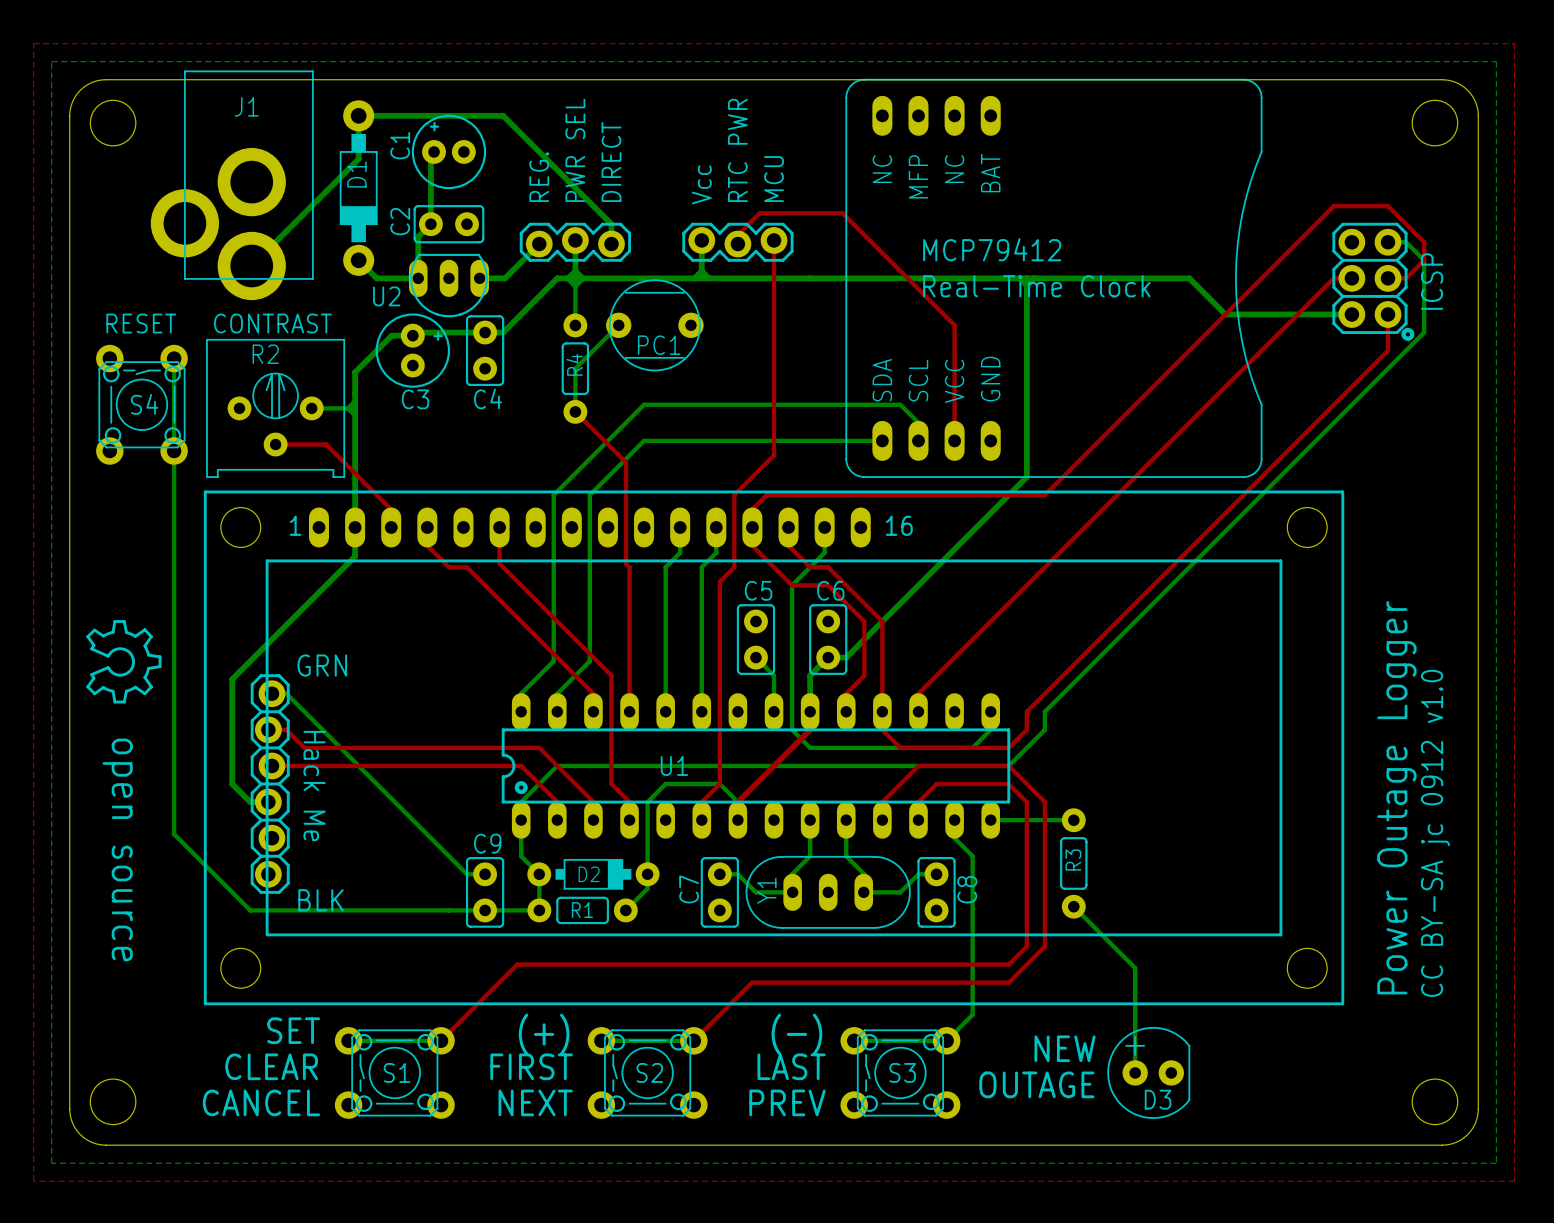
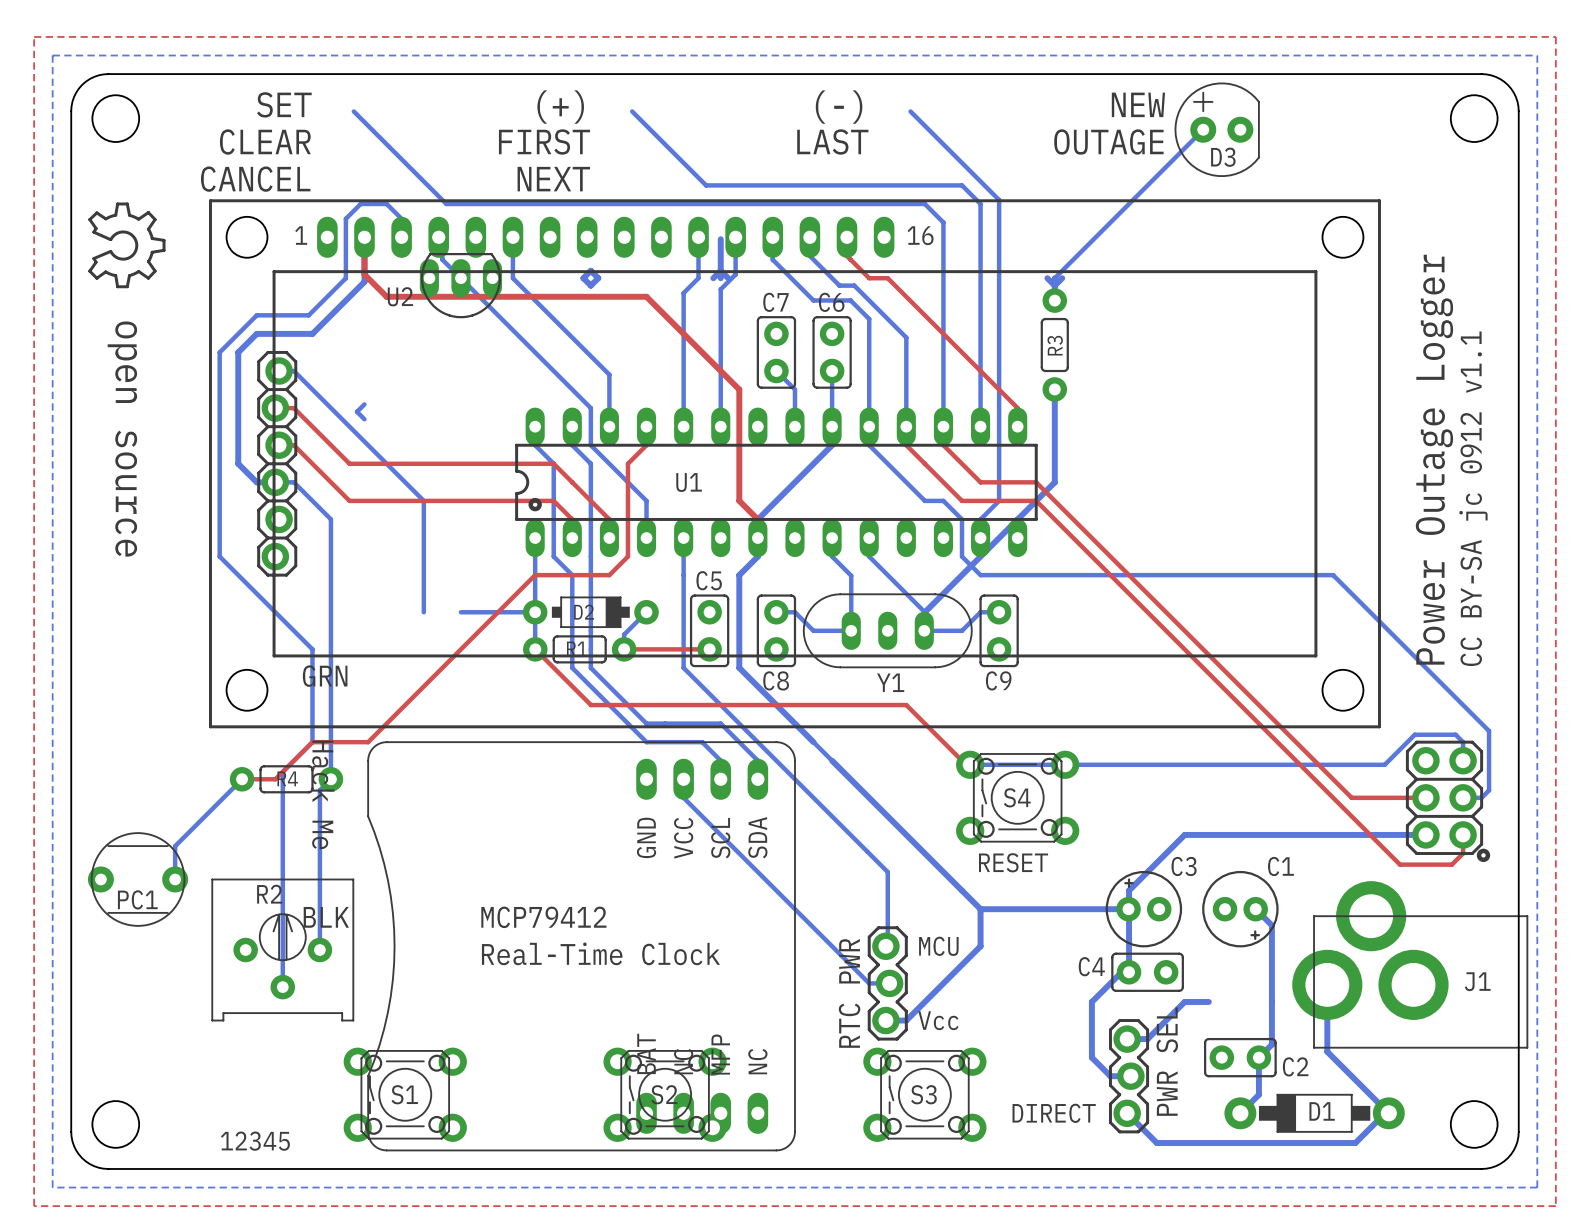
text: none -> SET (284, 104)
text: none -> NEW (1138, 104)
text: none -> (+) (560, 107)
text: none -> (-) (839, 107)
bottom track: none -> (353, 111) (446, 203) (924, 203) (943, 222) (943, 426)
bottom track: none -> (632, 111) (706, 185) (962, 185) (980, 203) (980, 426)
bottom track: none -> (910, 111) (999, 200) (999, 500) (980, 519) (980, 538)
bottom track: none -> (1203, 129) (1054, 278)
text: none -> CLEAR (265, 142)
C1 name position: C1 (400, 145) -> C1 (1280, 866)
text: none -> FIRST (544, 142)
text: none -> LAST (832, 142)
text: none -> OUTAGE (1108, 142)
text: PWR SEL (575, 150) -> none
text: RTC PWR (737, 150) -> none
bottom track: (434, 151) (430, 155) (430, 224) (418, 236) (418, 278) (376, 278) (358, 260) -> none
C1 rotation: 0° (448, 151) -> 180° (1240, 909)
C1 position: (448, 151) -> (1240, 909)
text: DIRECT (611, 161) -> none
text: REG. (539, 177) -> none
text: MCU (774, 179) -> none
text: none -> CANCEL (255, 179)
text: none -> NEXT (553, 179)
text: Vcc (701, 184) -> none
J1 rotation: 0° (232, 185) -> 90° clockwise (1410, 964)
J1 position: (232, 185) -> (1410, 964)
D1 rotation: 0° (358, 188) -> 90° clockwise (1314, 1113)
D1 position: (358, 188) -> (1314, 1113)
drawing: none -> [88, 202, 166, 289]
C2 name rotation: 0° (400, 221) -> 90° clockwise (1295, 1066)
C2 name position: C2 (400, 221) -> C2 (1295, 1066)
C2 position: (448, 224) -> (1240, 1057)
top track: none -> (364, 237) (364, 274) (386, 296) (646, 296) (739, 389) (739, 500) (757, 519) (757, 538)
bottom track: none -> (364, 237) (364, 281) (312, 333) (256, 333) (238, 352) (238, 463) (256, 482) (293, 482) (330, 519) (330, 779) (319, 790) (319, 950)
bottom track: none -> (401, 237) (405, 233) (405, 222) (386, 203) (360, 203) (345, 218) (345, 278) (308, 315) (256, 315) (219, 352) (219, 556) (312, 649) (312, 742) (282, 771) (282, 987)
bottom track: none -> (512, 237) (512, 278) (609, 374) (609, 426)
bottom track: none -> (698, 237) (698, 278) (683, 293) (683, 426)
bottom track: none -> (735, 237) (735, 274) (720, 289) (720, 426)
bottom track: none -> (772, 237) (772, 259) (813, 300) (850, 300) (869, 319) (869, 445) (924, 500) (943, 500) (962, 519) (962, 556) (980, 575) (1333, 575) (1489, 731) (1489, 790) (1481, 797) (1463, 797)
bottom track: none -> (809, 237) (809, 255) (839, 285) (854, 285) (906, 337) (906, 426)
top track: none -> (847, 237) (847, 256) (869, 278) (887, 278) (1017, 408) (1017, 426)
bottom track: (575, 240) (575, 325) -> none
top track: (774, 240) (774, 455) (734, 495) (734, 567) (719, 581) (719, 784) (701, 802) (701, 820) -> none
part: (575, 242) -> none
part: (737, 242) -> none
bottom track: (1388, 242) (1406, 242) (1424, 260) (1424, 332) (1044, 711) (1044, 729) (1008, 765) (557, 765) (521, 802) (521, 856) (539, 874) (539, 910) (250, 910) (174, 834) (174, 358) -> none
bottom track: (539, 244) (504, 278) (479, 278) -> none
bottom track: (611, 244) (611, 224) (503, 115) (358, 115) (358, 159) (251, 265) -> none
top track: (737, 244) (737, 235) (759, 213) (842, 213) (954, 325) (954, 440) -> none
text: MCP79412 (992, 249) -> none
part: (1053, 278) -> none
top track: (1351, 278) (1333, 278) (918, 693) (918, 711) -> none
top track: (1388, 278) (1406, 278) (1424, 260) (1424, 242) (1388, 206) (1333, 206) (1044, 495) (1008, 495) -> (1463, 834) (1463, 853) (1451, 864) (1399, 864) (1036, 500)
part: (1373, 281) -> none
text: ICSP (1432, 281) -> none
text: Real-Time Clock (1036, 286) -> none
bottom track: (1026, 300) (1026, 386) -> none
bottom track: (1351, 314) (1225, 314) (1189, 278) (557, 278) (503, 332) (412, 332) (412, 335) (391, 335) (355, 372) (355, 556) (232, 679) (232, 784) (250, 802) (268, 802) -> none
top track: (1388, 314) (1388, 350) (1026, 711) (1026, 729) (1008, 747) (900, 747) (882, 729) (882, 621) (828, 567) (810, 567) (788, 545) (788, 527) -> none
text: RESET (141, 323) -> none
text: CONTRAST (272, 323) -> none
bottom track: (618, 325) (575, 368) (575, 404) -> (438, 237) (442, 240) (442, 259) (590, 408)
PC1 position: (654, 325) -> (138, 879)
PC1 name position: PC1 (659, 345) -> PC1 (137, 899)
C3 rotation: 0° (412, 350) -> 90° counterclockwise (1143, 909)
C3 position: (412, 350) -> (1143, 909)
C4 rotation: 0° (485, 350) -> 90° clockwise (1147, 972)
C4 position: (485, 350) -> (1147, 972)
bottom track: none -> (279, 371) (293, 371) (423, 500) (423, 612)
R4 rotation: 0° (575, 368) -> 90° clockwise (286, 779)
R4 position: (575, 368) -> (286, 779)
C3 name position: C3 (415, 399) -> C3 (1184, 866)
S4 rotation: 0° (141, 404) -> 90° counterclockwise (1017, 797)
S4 position: (141, 404) -> (1017, 797)
R2 position: (275, 408) -> (282, 950)
bottom track: (311, 408) (355, 408) -> none
top track: (575, 411) (625, 462) (625, 563) (629, 567) (629, 711) -> none
bottom track: none -> (590, 415) (590, 445) (646, 500) (646, 538)
bottom track: none -> (535, 426) (535, 445) (553, 463) (553, 556) (572, 575) (572, 667) (646, 742) (702, 742) (720, 760) (720, 779)
bottom track: none -> (572, 426) (572, 445) (590, 463) (590, 667) (646, 723) (720, 723) (757, 760) (757, 779)
top track: none -> (646, 426) (646, 445) (627, 463) (627, 556) (609, 575) (535, 575) (368, 742) (312, 742) (275, 779) (242, 779)
top track: none -> (943, 426) (943, 445) (980, 482) (1036, 482) (1351, 797) (1425, 797)
text: none -> open source (122, 439)
top track: none -> (279, 445) (293, 445) (349, 500) (553, 500) (572, 519) (572, 538)
bottom track: (882, 440) (644, 440) (589, 495) (589, 661) (557, 693) (557, 711) -> none
bottom track: (918, 440) (918, 422) (900, 404) (644, 404) (553, 495) (553, 661) (521, 693) (521, 711) -> none
top track: (275, 444) (326, 444) -> (275, 408) (293, 408) (334, 448)
top track: (340, 458) (391, 509) (391, 527) -> (349, 463) (553, 463) (609, 519) (609, 538)
top track: (936, 495) (766, 495) (752, 509) (752, 545) (792, 585) (828, 585) (864, 621) (864, 675) (846, 693) (846, 711) -> (962, 500) (906, 445) (906, 426)
top track: (427, 527) (427, 545) (448, 567) (467, 567) (593, 693) (593, 711) -> none
top track: (499, 527) (499, 563) (611, 675) (611, 784) (629, 802) (629, 820) -> none
bottom track: (680, 527) (680, 552) (665, 567) -> (683, 538) (683, 575)
bottom track: (716, 527) (716, 552) (701, 567) (701, 711) -> none
bottom track: (824, 527) (824, 552) (792, 585) (792, 729) -> (832, 371) (832, 445) (757, 519) (757, 556) (739, 575) (739, 667) (813, 742)
bottom track: none -> (535, 538) (535, 649)
bottom track: none -> (832, 538) (832, 556) (851, 575) (851, 630) (813, 630) (794, 612) (776, 612)
bottom track: none -> (869, 538) (869, 556) (924, 612) (924, 630) (962, 630) (980, 612) (999, 612)
bottom track: none -> (460, 612) (535, 612)
bottom track: none -> (646, 612) (624, 634) (624, 649)
bottom track: (899, 603) (846, 657) (828, 657) (810, 675) (810, 711) -> none
drawing: [86, 620, 162, 704] -> none
top track: none -> (535, 649) (590, 705) (906, 705) (966, 764) (970, 764)
top track: none -> (624, 649) (709, 649)
C5 position: (755, 639) -> (709, 630)
C6 position: (828, 639) -> (832, 352)
bottom track: (665, 657) (665, 711) -> (683, 667) (887, 872) (887, 946) (885, 946)
bottom track: (755, 657) (774, 675) (774, 711) -> (776, 371) (794, 389) (794, 426)
bottom track: (271, 693) (286, 693) (467, 874) (485, 874) -> none
top track: (810, 711) (810, 729) (737, 802) (737, 820) -> none
bottom track: (990, 711) (990, 729) (972, 747) (810, 747) -> (980, 909) (832, 760)
top track: (268, 729) (286, 729) (304, 747) (539, 747) (593, 802) (593, 820) -> none
part position: (774, 747) -> (794, 463)
bottom track: none -> (1463, 760) (1463, 742) (1455, 734) (1414, 734) (1384, 764) (970, 764)
bottom track: none -> (242, 779) (175, 846) (175, 879)
top track: (271, 765) (521, 765) (557, 802) (557, 820) -> none
bottom track: none -> (683, 779) (683, 797) (869, 983) (889, 983)
U1 position: (755, 765) -> (776, 482)
part position: (270, 784) -> (277, 463)
part: none -> (1448, 801)
text position: Power Outage Logger (1396, 797) -> Power Outage Logger (1434, 459)
bottom track: (737, 820) (737, 802) (719, 784) (665, 784) (647, 802) (647, 888) (625, 910) -> none
bottom track: (810, 820) (810, 856) (792, 874) (792, 892) (755, 892) (737, 874) (719, 874) -> none
bottom track: (846, 820) (846, 856) (864, 874) (863, 892) (900, 892) (918, 874) (936, 874) -> none
top track: (882, 820) (882, 802) (918, 765) (1008, 765) (1044, 802) (1044, 946) (1008, 982) (751, 982) (693, 1040) -> none
top track: (918, 820) (918, 802) (936, 784) (1008, 784) (1026, 802) (1026, 946) (1008, 964) (517, 964) (441, 1040) -> none
bottom track: (954, 820) (954, 838) (972, 856) (972, 1014) (946, 1040) (854, 1040) -> none
bottom track: (990, 820) (1073, 820) -> none
bottom track: none -> (1425, 834) (1184, 834) (1129, 890) (1128, 909)
text: CC BY-SA jc 0912 v1.0 (1435, 833) -> CC BY-SA jc 0912 v1.1 (1473, 498)
C9 name position: C9 (487, 843) -> C9 (998, 680)
text: none -> RESET (1013, 862)
text: open source (117, 849) -> none
R3 name position: R3 (1073, 859) -> R3 (1055, 345)
R3 position: (1073, 863) -> (1054, 345)
D2 position: (593, 874) -> (590, 612)
C7 name rotation: 0° (689, 889) -> 90° clockwise (775, 302)
C7 name position: C7 (689, 889) -> C7 (775, 302)
C8 name rotation: 0° (967, 889) -> 90° clockwise (776, 680)
C8 name position: C8 (967, 889) -> C8 (776, 680)
Y1 name rotation: 0° (766, 890) -> 90° clockwise (890, 682)
Y1 name position: Y1 (766, 890) -> Y1 (890, 682)
C9 position: (485, 892) -> (999, 630)
C7 position: (719, 892) -> (776, 352)
Y1 position: (828, 892) -> (887, 630)
C8 position: (936, 892) -> (776, 630)
bottom track: none -> (980, 909) (1128, 909)
bottom track: none -> (980, 909) (980, 946) (906, 1020) (885, 1020)
bottom track: none -> (1128, 909) (1129, 972) (1121, 972) (1091, 1001) (1091, 1057) (1110, 1076) (1130, 1076)
bottom track: none -> (1255, 909) (1271, 925) (1271, 1044) (1258, 1057) (1258, 1094) (1240, 1113)
text: none -> MCP79412 (543, 917)
bottom track: (1073, 906) (1135, 968) (1135, 1072) -> none
R1 position: (582, 910) -> (579, 649)
part: none -> (581, 946)
text: none -> MCU (938, 946)
text: none -> Real-Time Clock (600, 953)
part: none -> (887, 983)
bottom track: none -> (1327, 984) (1327, 1051) (1388, 1113) (1385, 1113) (1355, 1143) (1156, 1143) (1127, 1113)
text: none -> RTC PWR (849, 993)
bottom track: none -> (1208, 1001) (1184, 1001) (1147, 1039) (1127, 1039)
text: none -> Vcc (938, 1020)
text: SET (293, 1030) -> none
text: (+) (544, 1034) -> none
text: (-) (796, 1034) -> none
bottom track: (348, 1040) (441, 1040) -> none
bottom track: (601, 1040) (693, 1040) -> none
text: none -> PWR SEL (1167, 1061)
text: NEW (1065, 1048) -> none
part: none -> (1129, 1076)
text: CLEAR (271, 1066) -> none
text: FIRST (531, 1066) -> none
text: LAST (791, 1066) -> none
D3 position: (1148, 1072) -> (1217, 129)
text: OUTAGE (1036, 1084) -> none
text: none -> DIRECT (1054, 1113)
text: CANCEL (261, 1102) -> none
text: NEXT (535, 1102) -> none
text: PREV (787, 1102) -> none
text: none -> 12345 (255, 1141)

